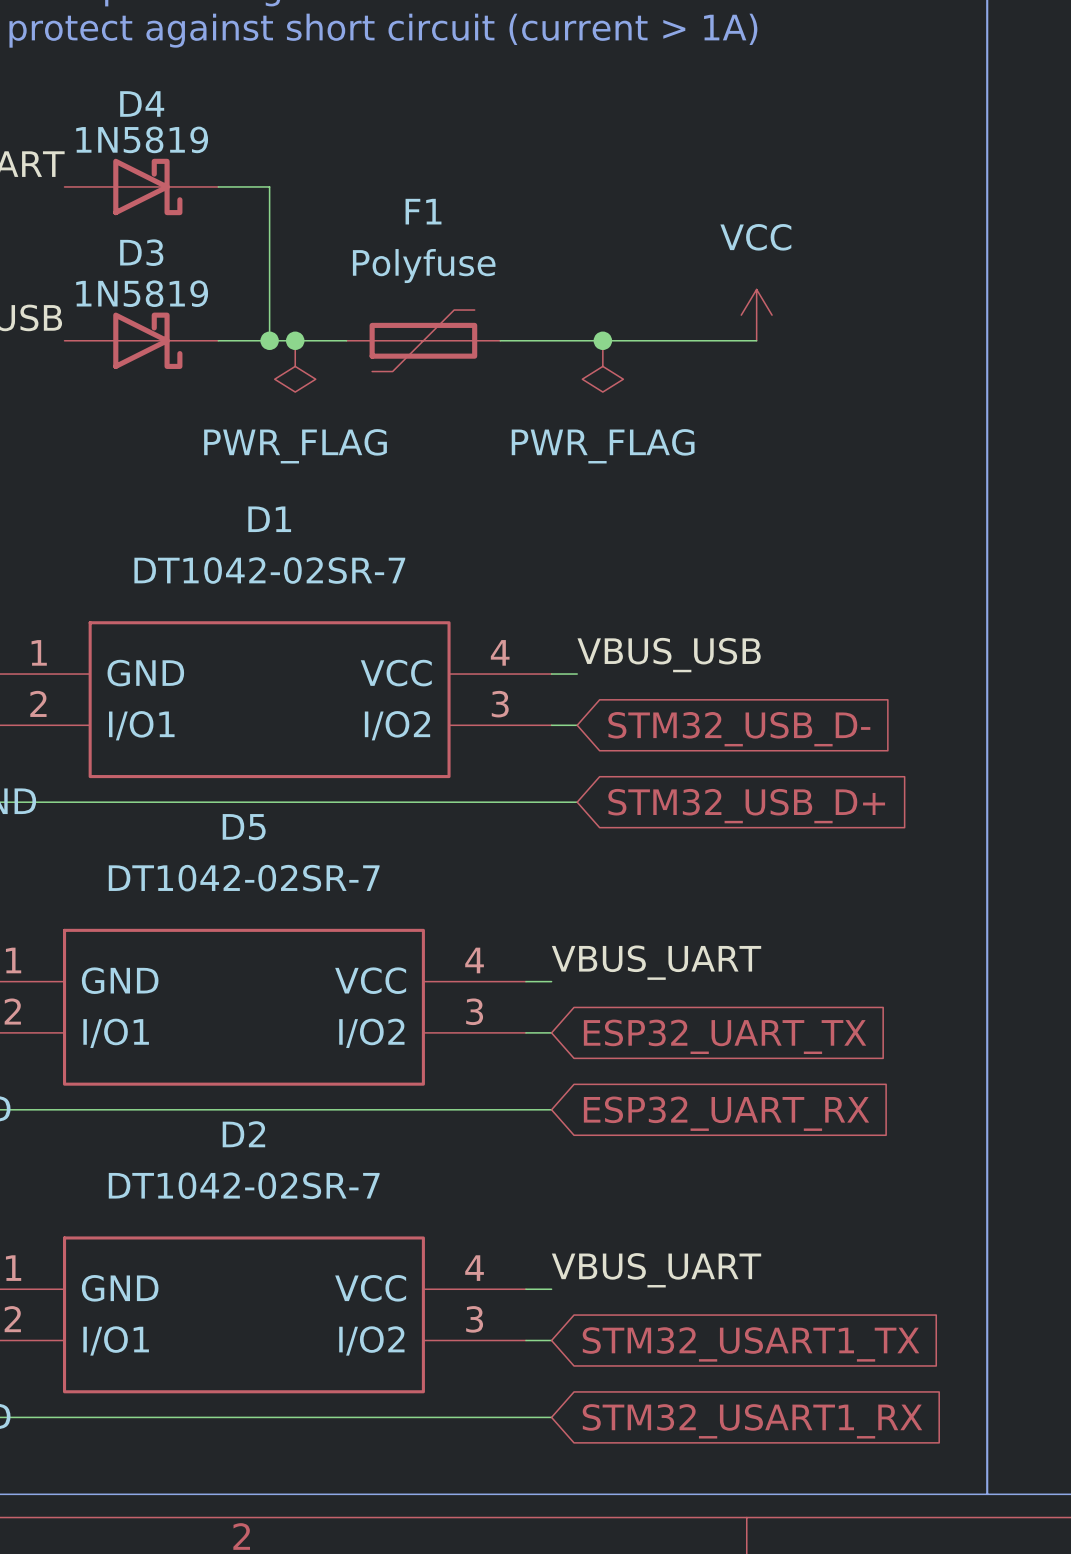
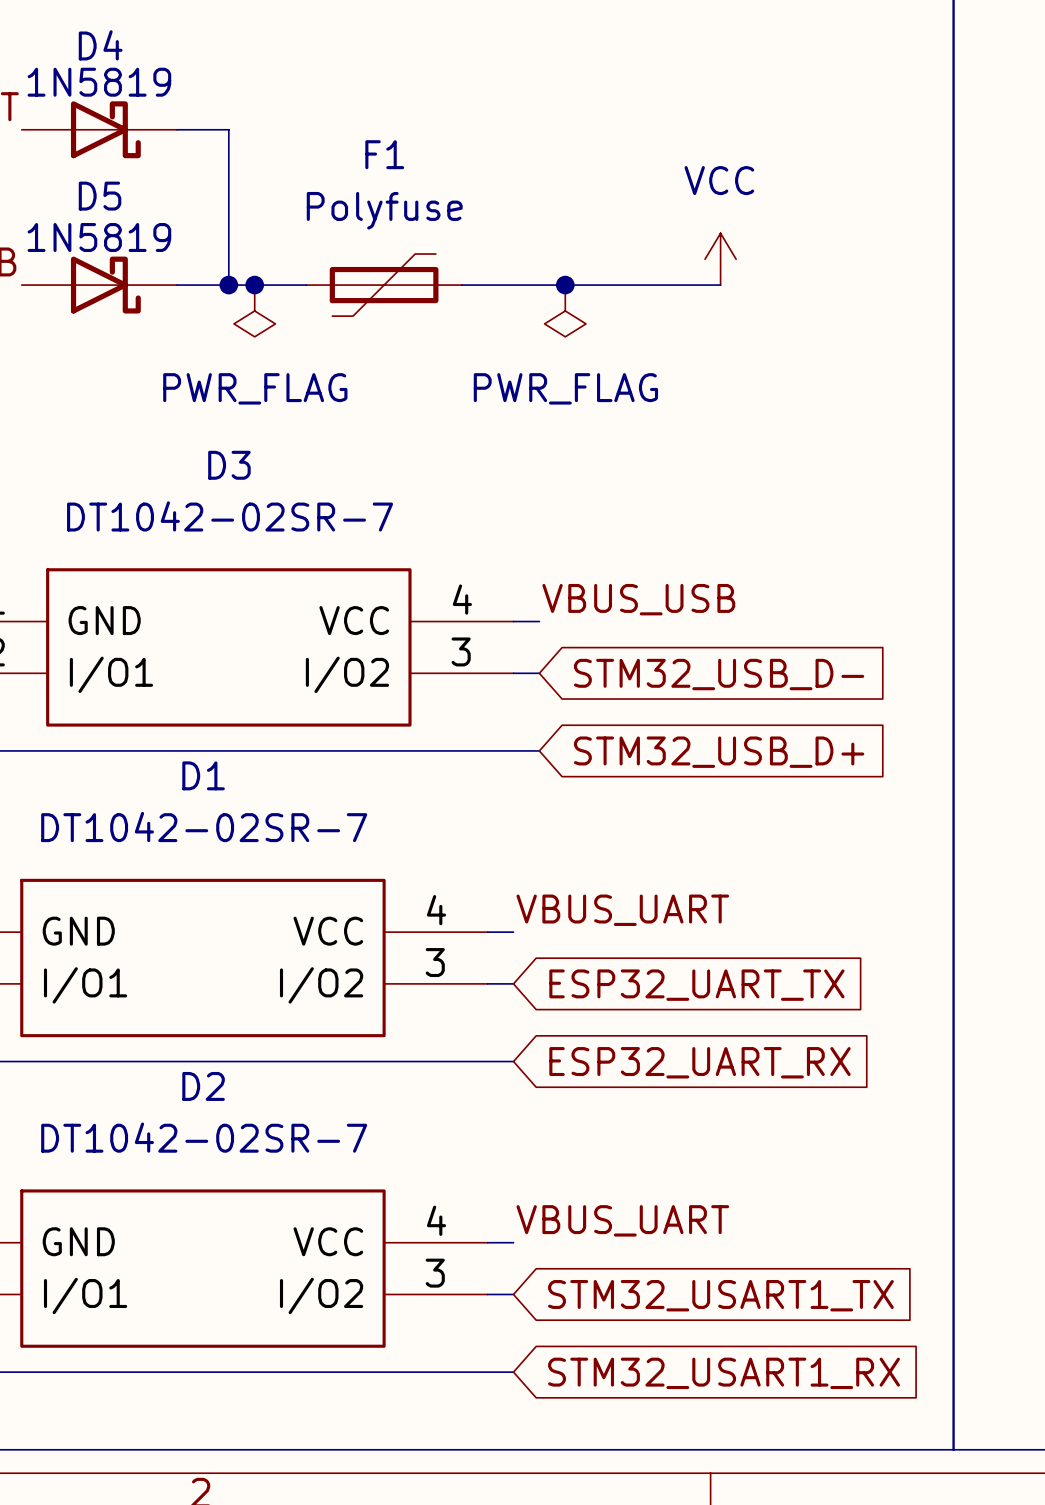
D3 name: D3 (141, 252) -> D5 (100, 196)
D1 name: D1 (269, 519) -> D3 (229, 465)
D5 name: D5 (244, 827) -> D1 (203, 775)

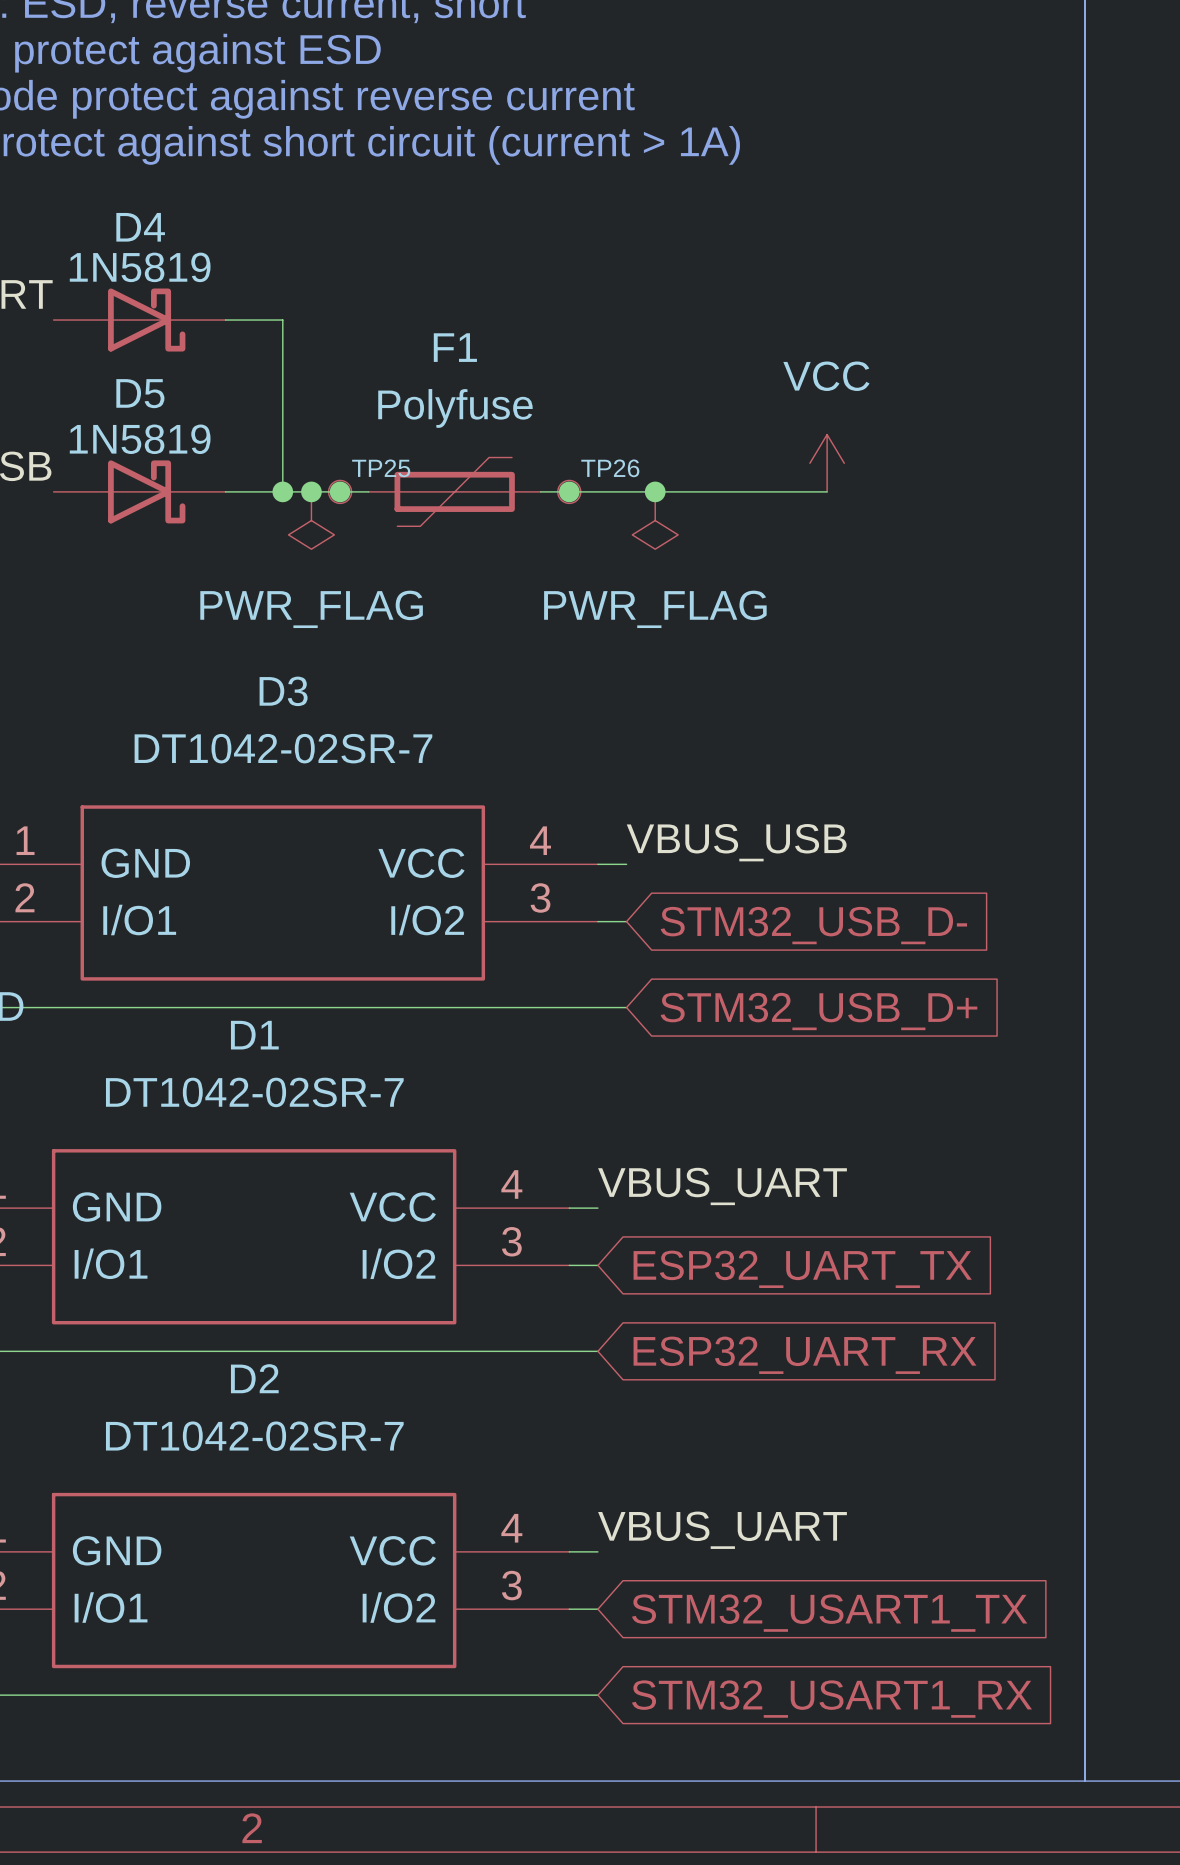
junction: none -> (340, 491)
TP25: none -> (340, 491)
junction: none -> (569, 491)
TP26: none -> (569, 491)

